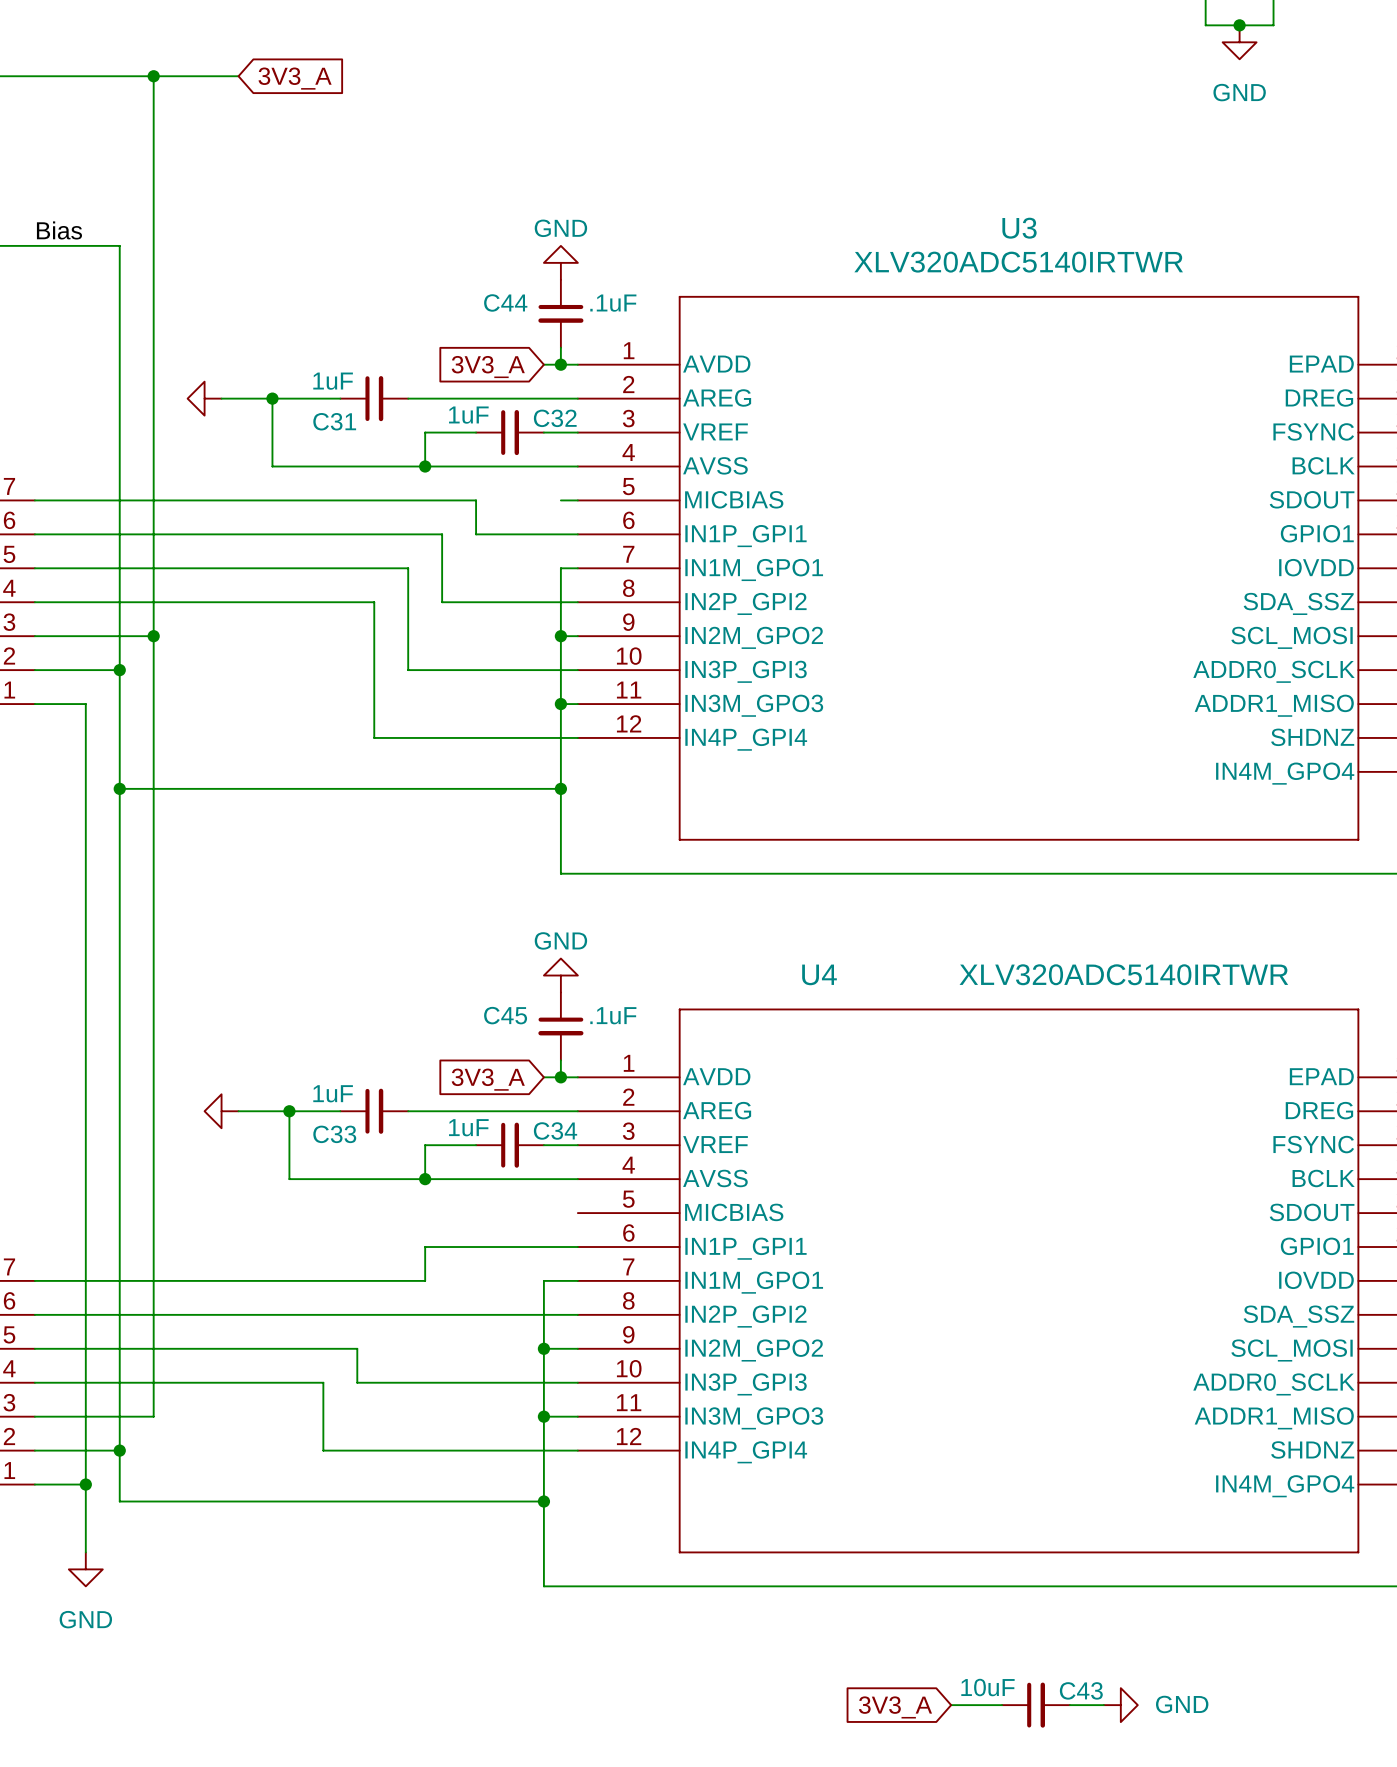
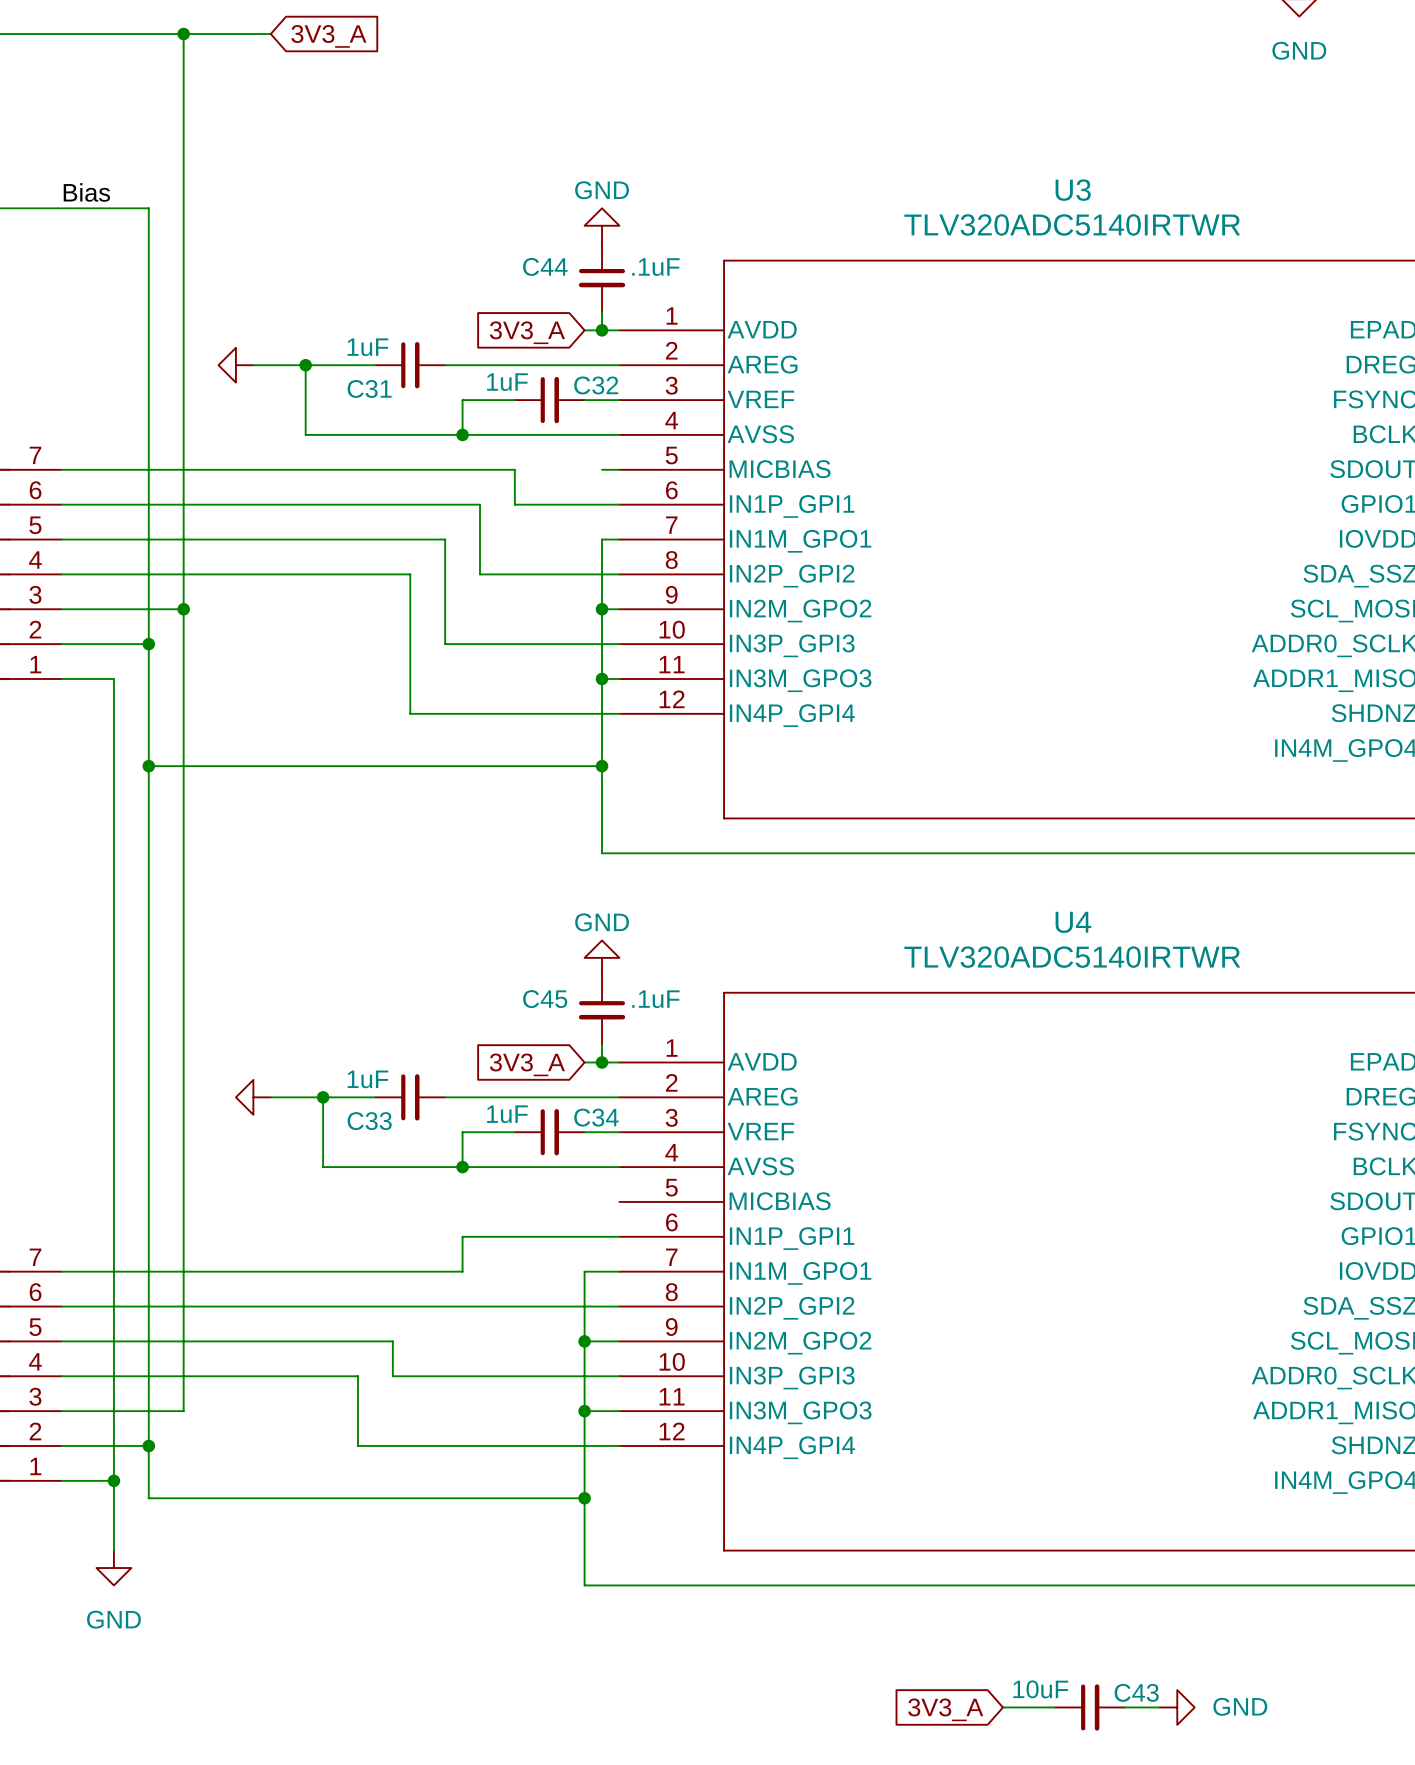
U3 value: XLV320ADC5140IRTWR (1018, 262) -> TLV320ADC5140IRTWR (1072, 224)
U4 name position: U4 (819, 974) -> U4 (1073, 922)
U4 value: XLV320ADC5140IRTWR (1123, 974) -> TLV320ADC5140IRTWR (1072, 957)

